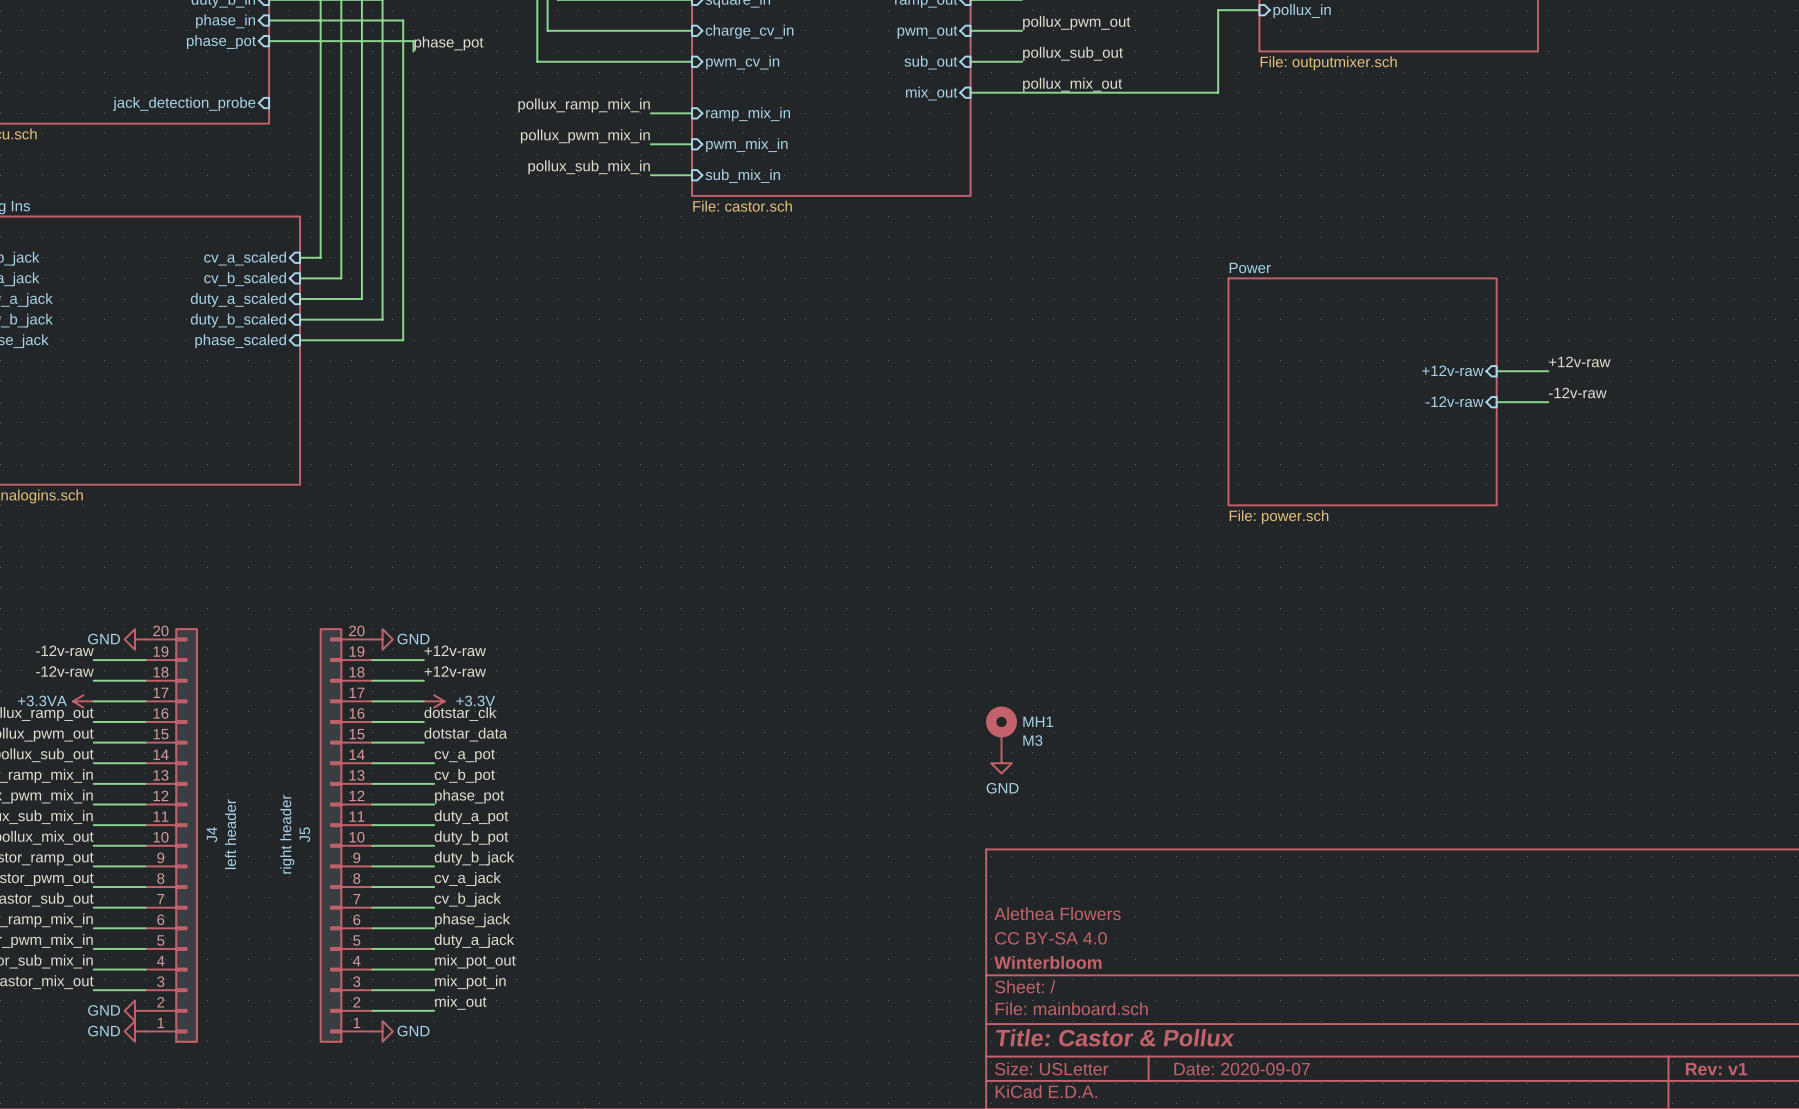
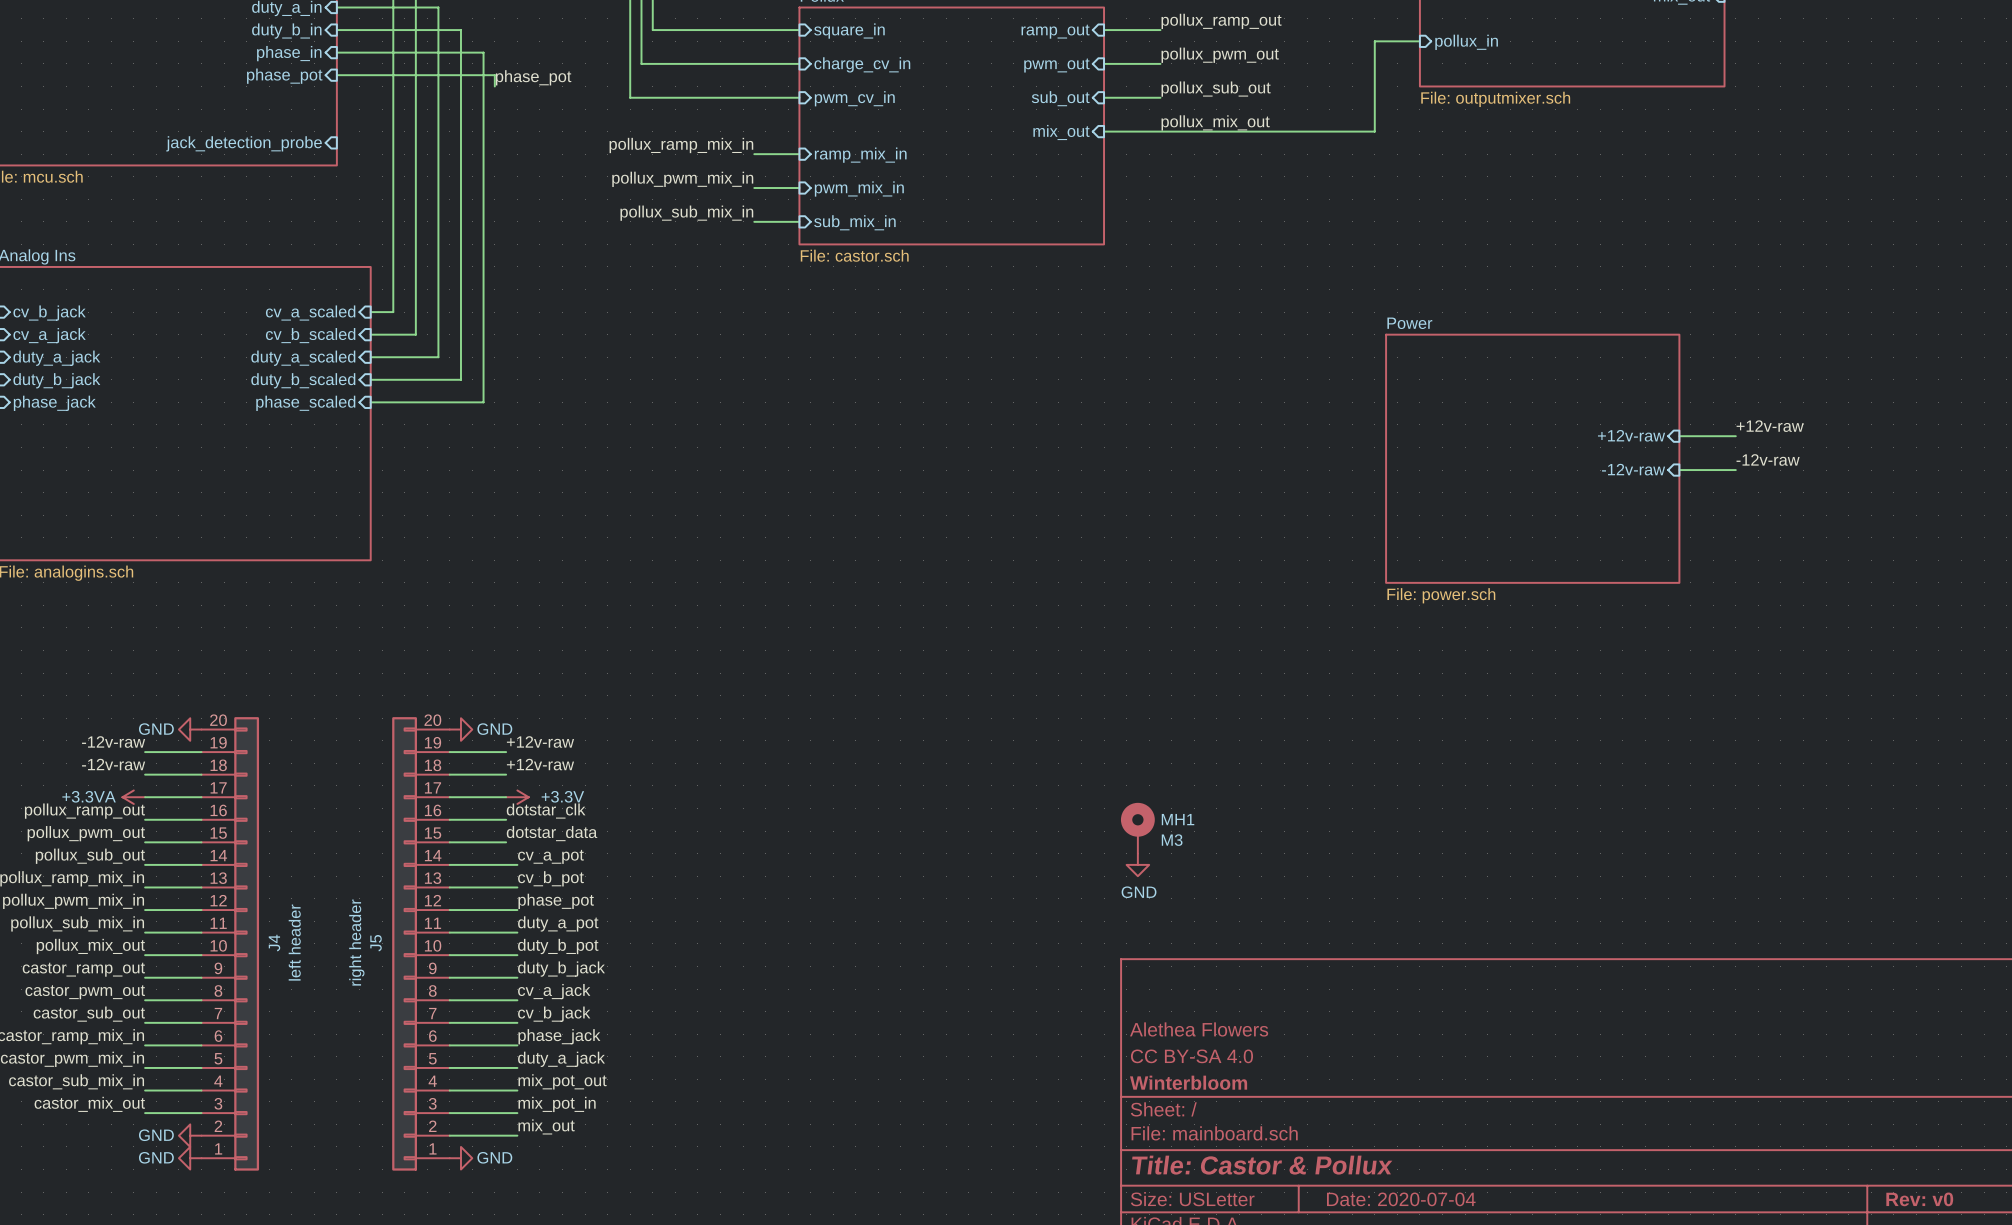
title block: Date: 2020-09-07 (1242, 1069) -> Date: 2020-07-04 (1401, 1199)
title block: Rev: v1 (1716, 1069) -> Rev: v0 (1919, 1199)

